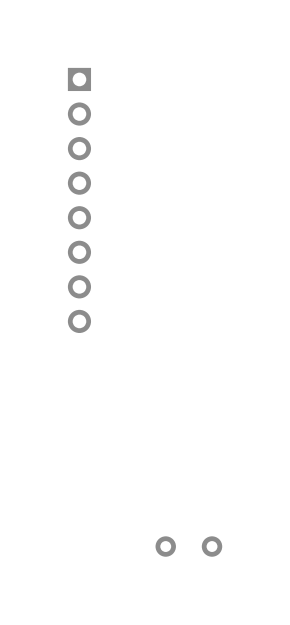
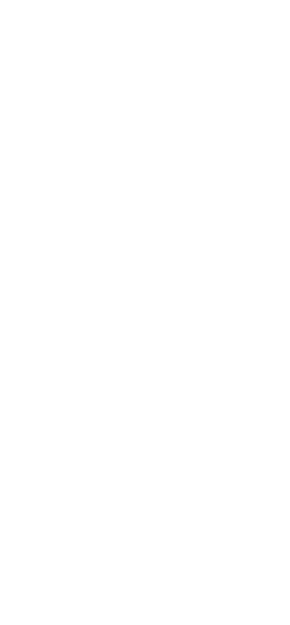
part: (79, 200) -> none
part: (188, 546) -> none

